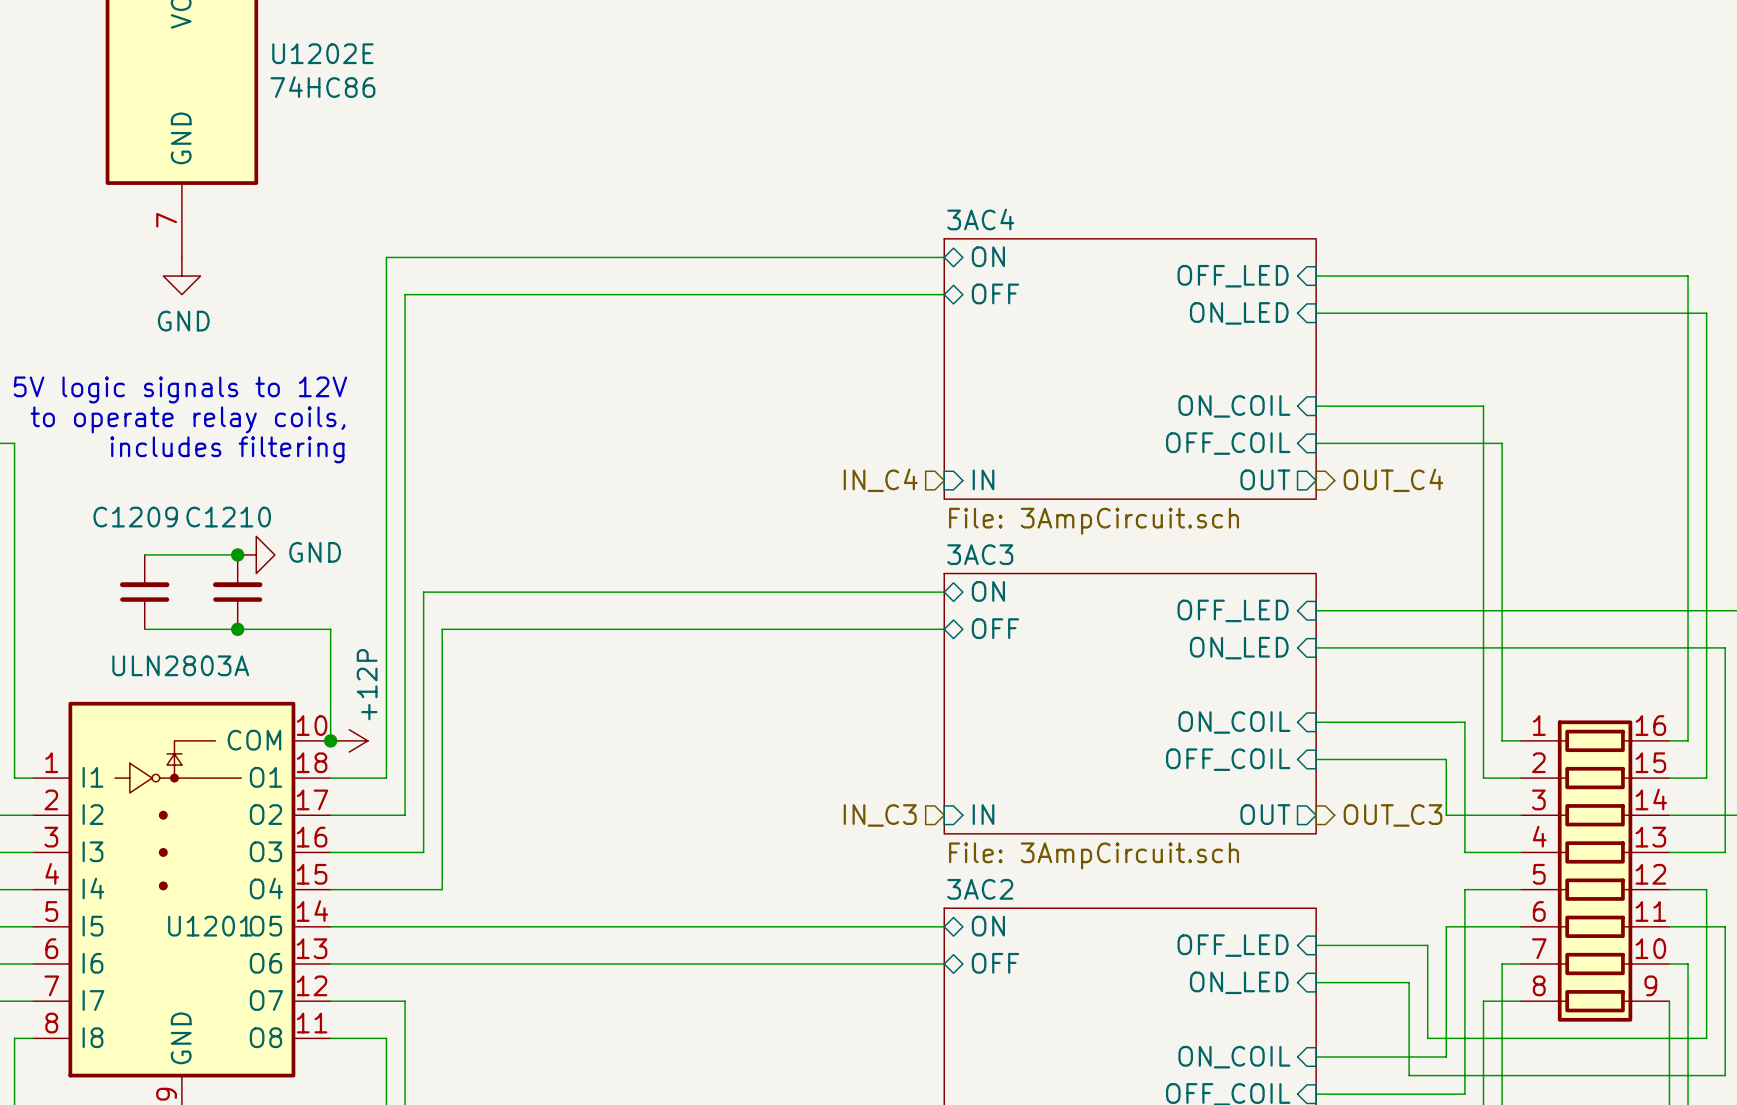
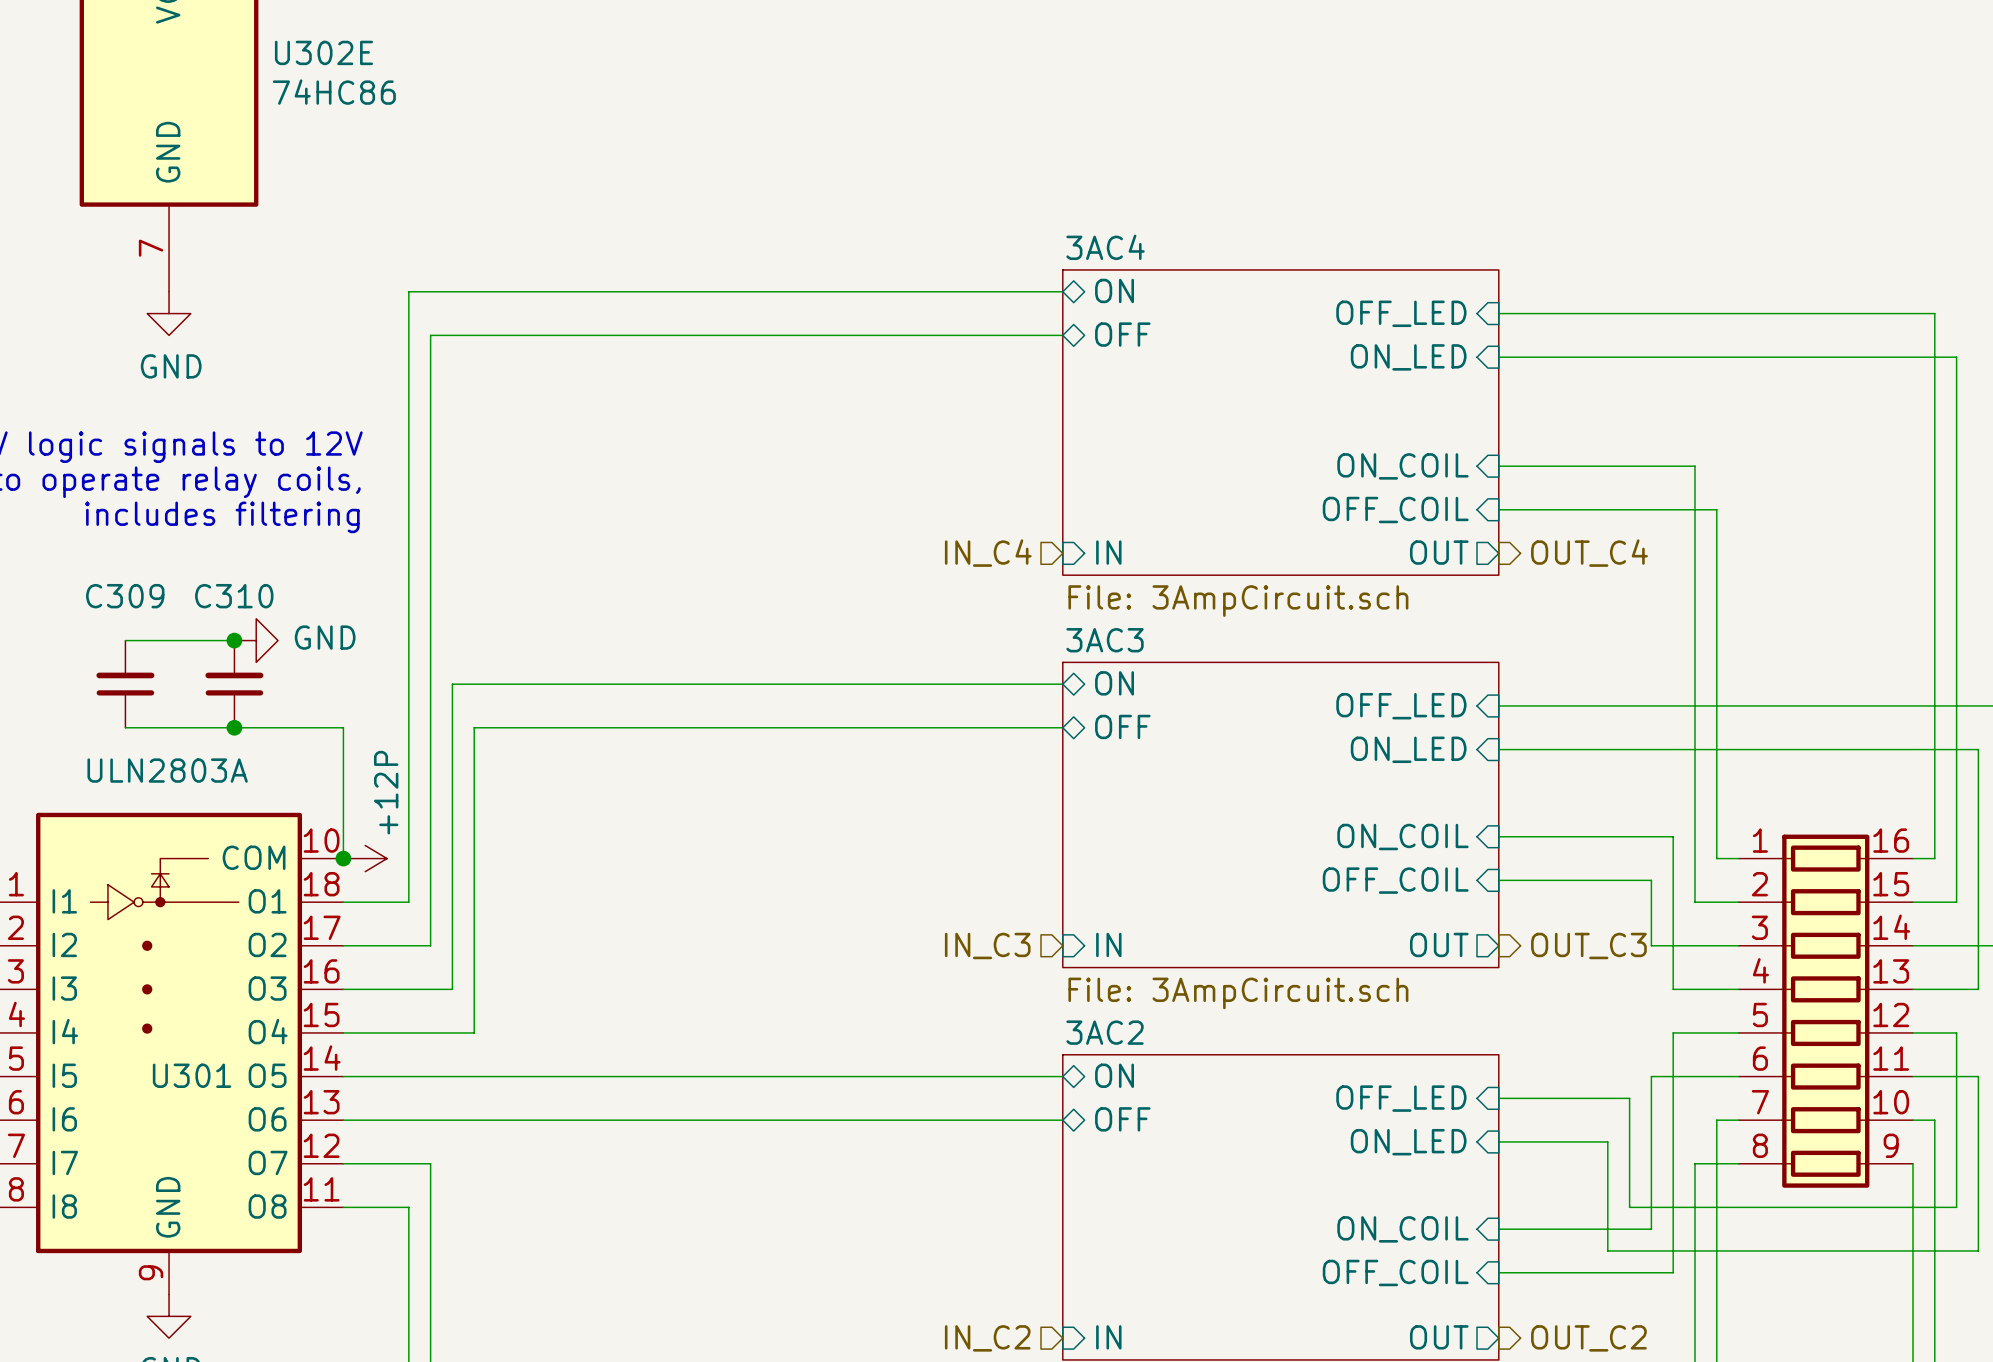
U1202E name: U1202E (322, 53) -> U302E (323, 52)
C1209 name: C1209 (135, 517) -> C309 (125, 596)
C1210 name: C1210 (228, 517) -> C310 (234, 596)
U1201 name: U1201 (210, 926) -> U301 (192, 1075)

